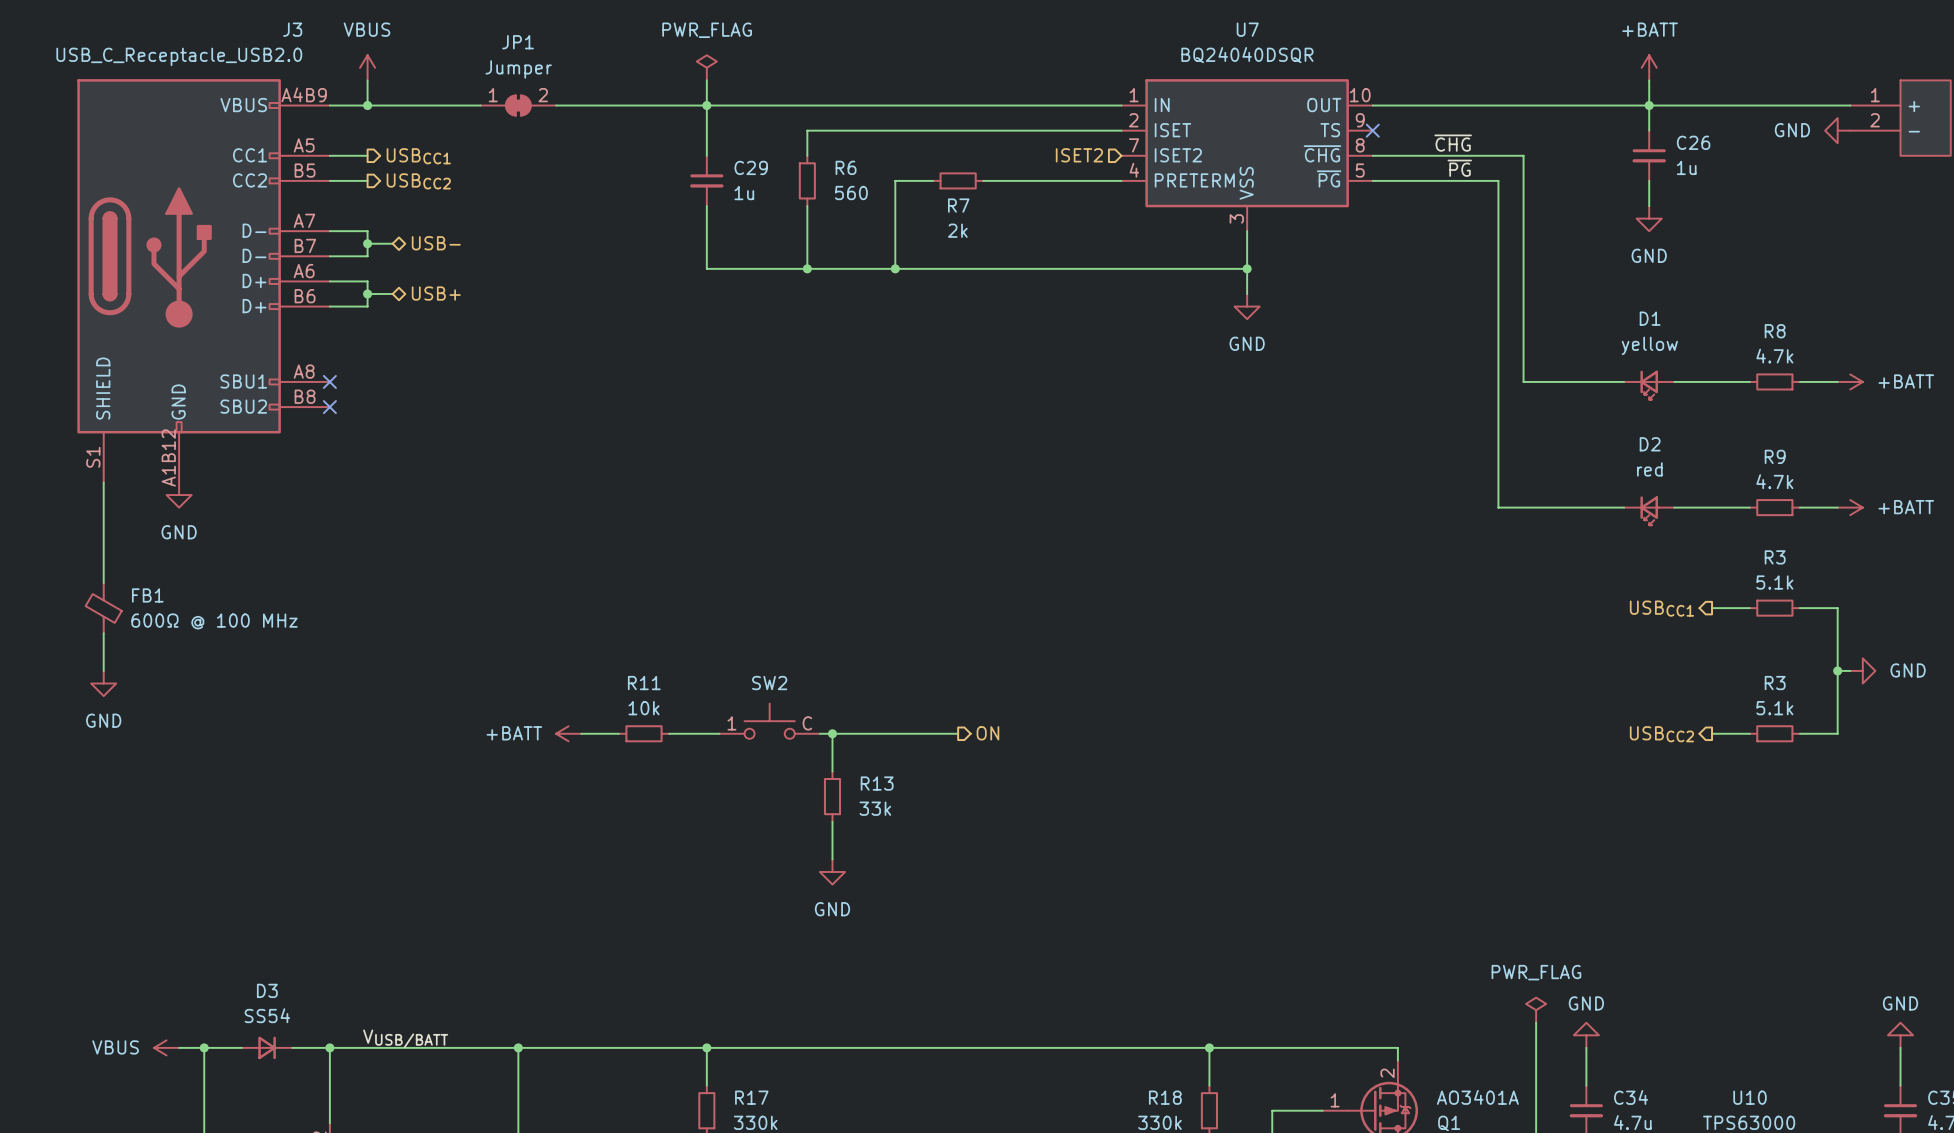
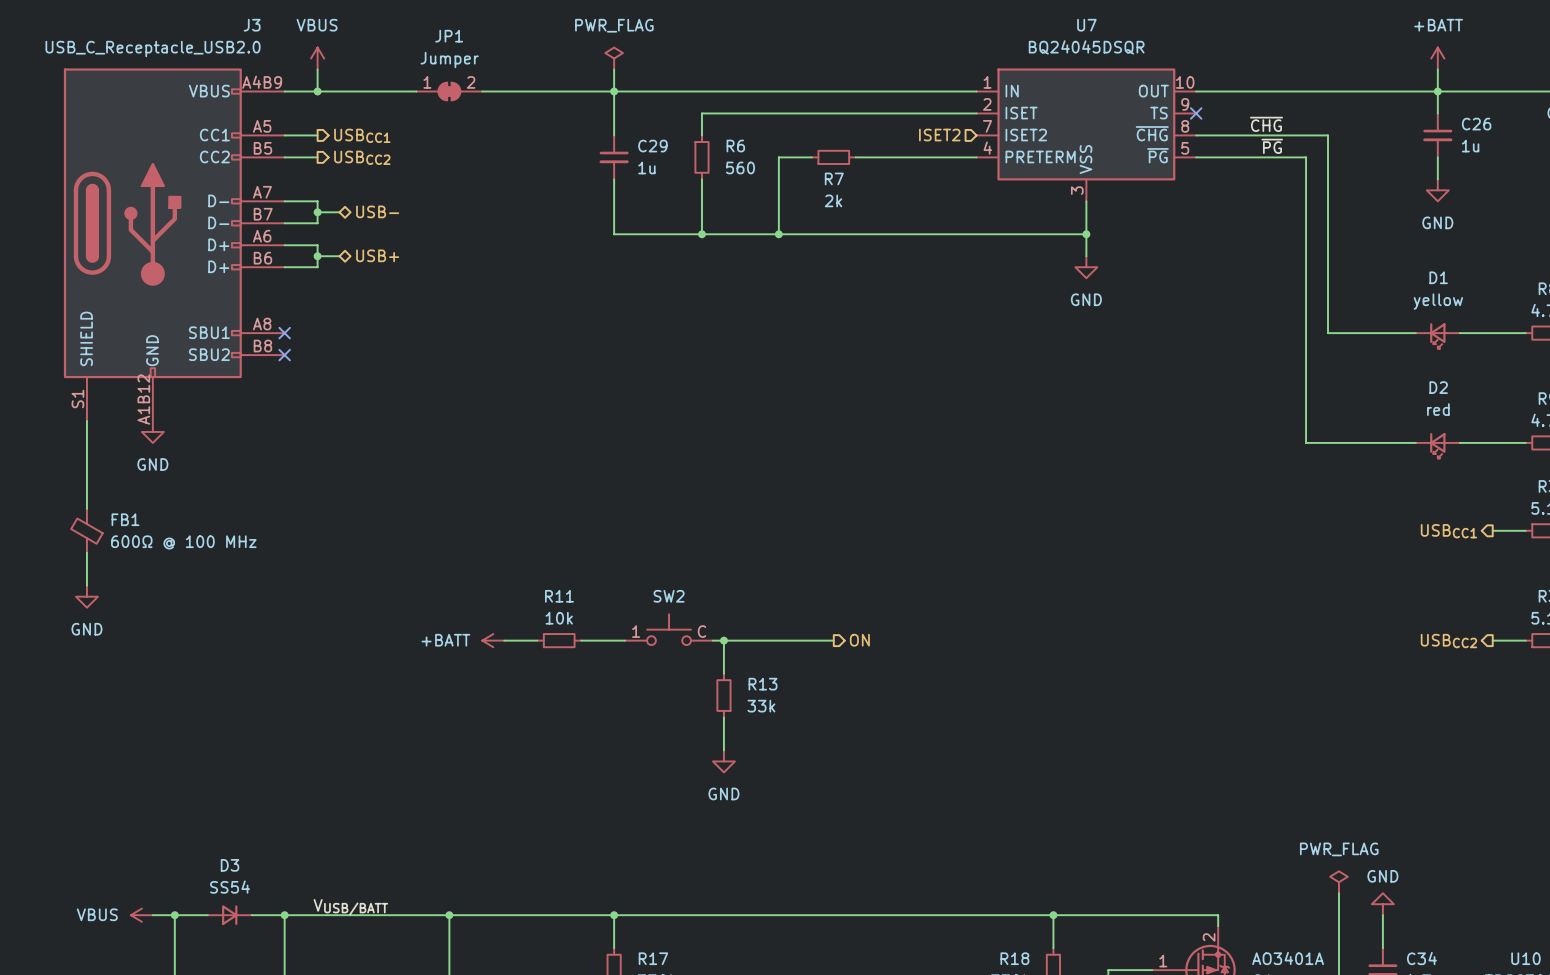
U7 value: BQ24040DSQR (1247, 55) -> BQ24045DSQR (1086, 47)

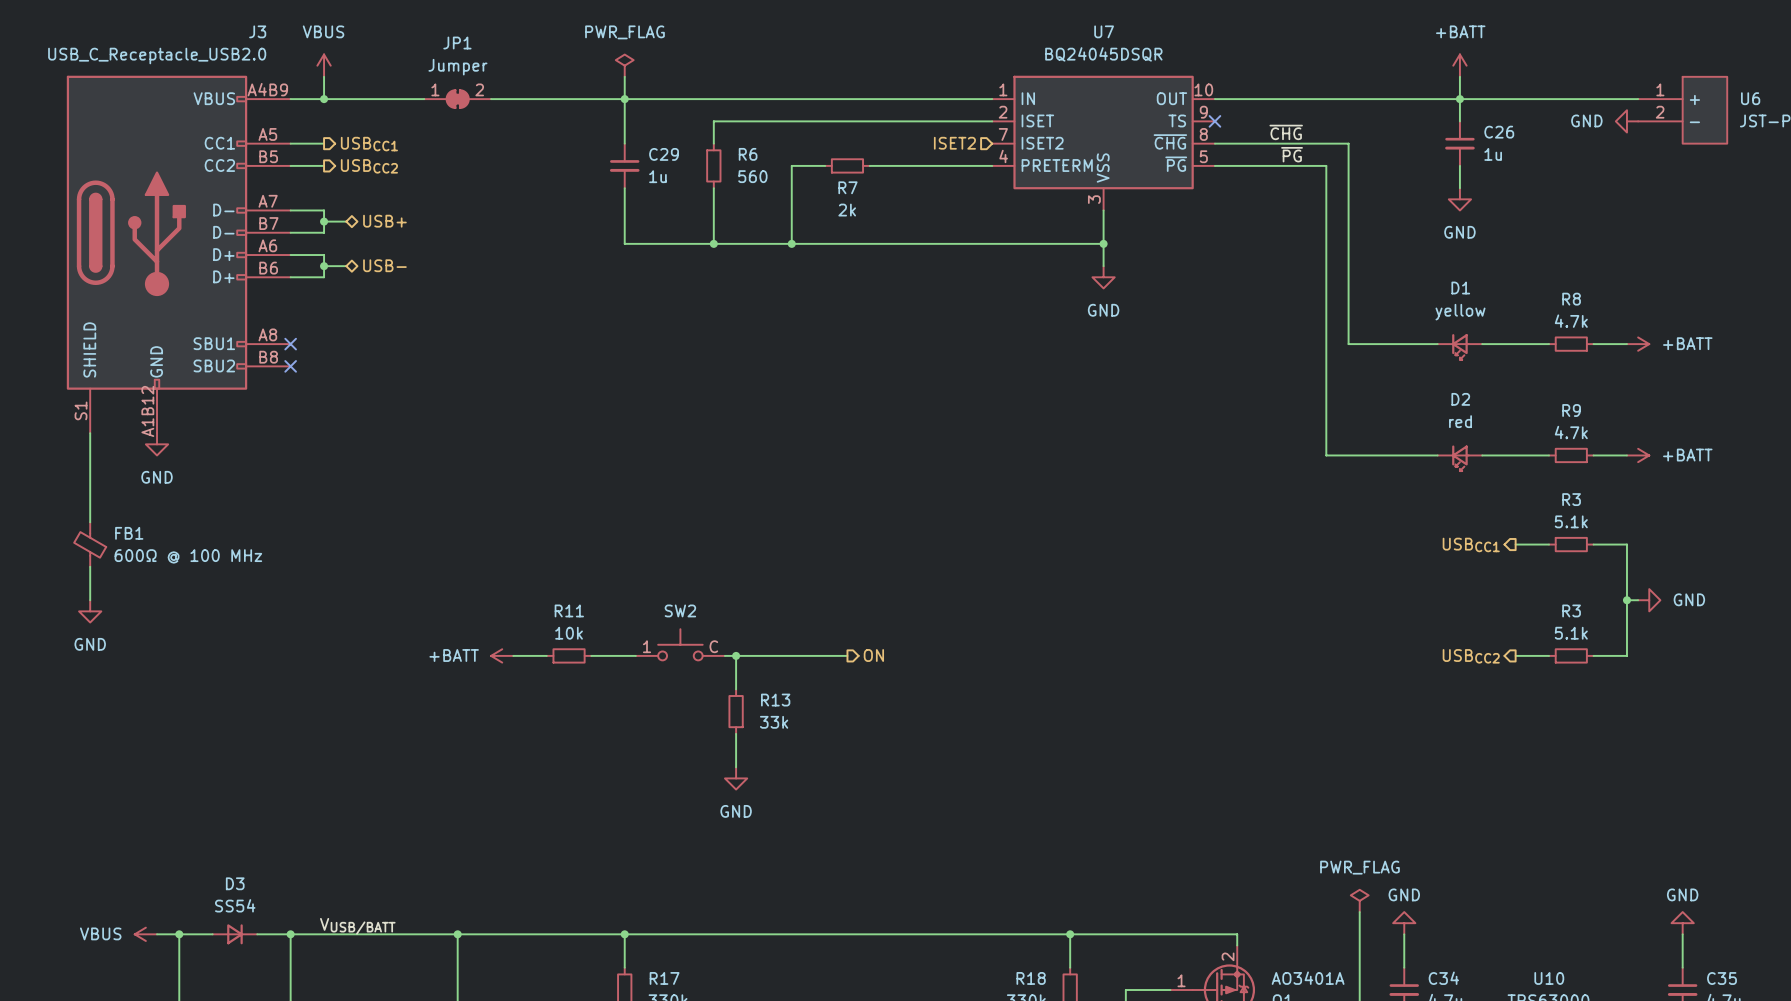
hierarchical label: USB- (377, 211) -> USB+ (384, 221)
hierarchical label: USB+ (377, 255) -> USB- (384, 265)

